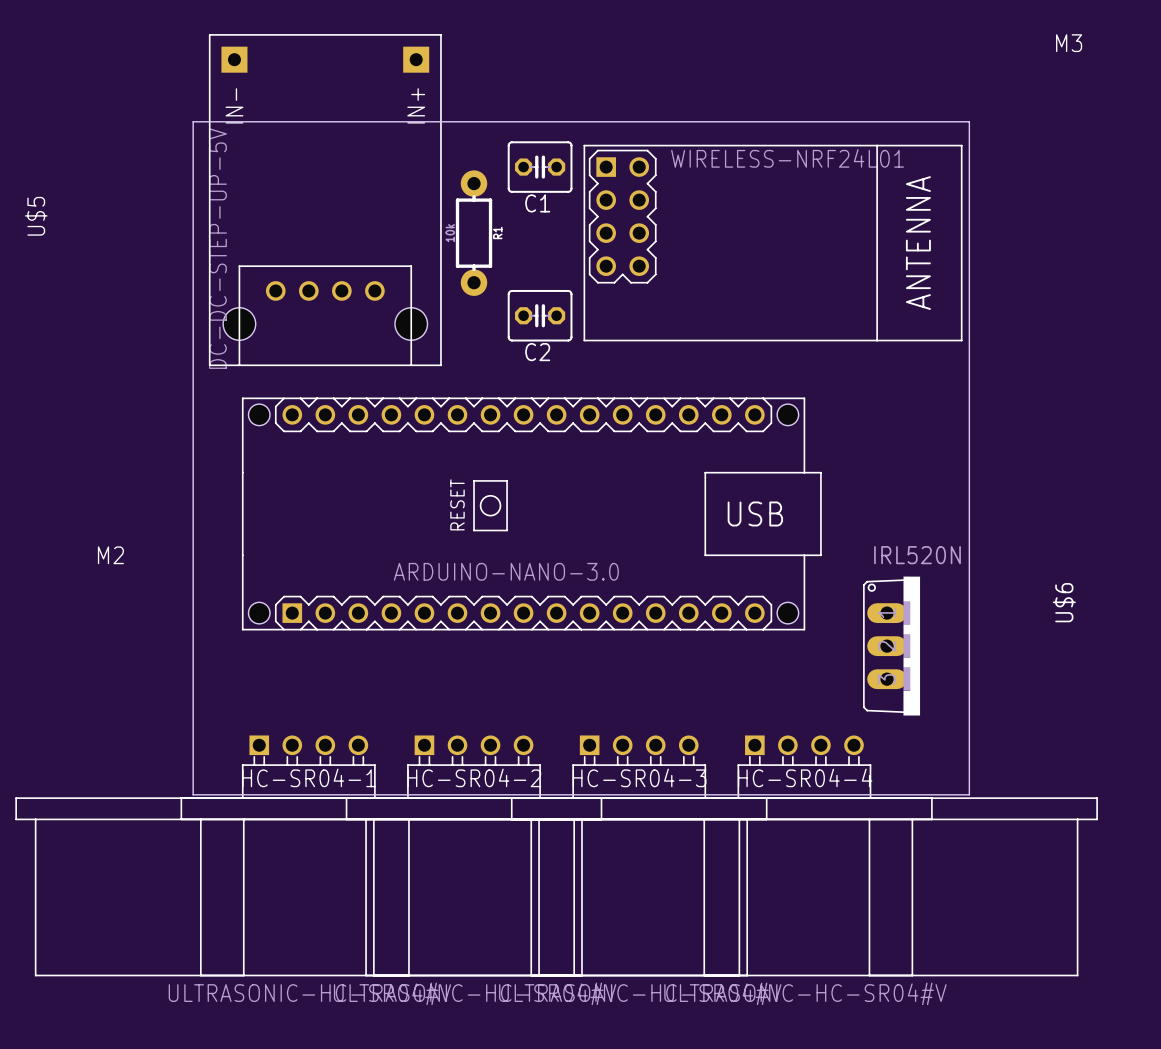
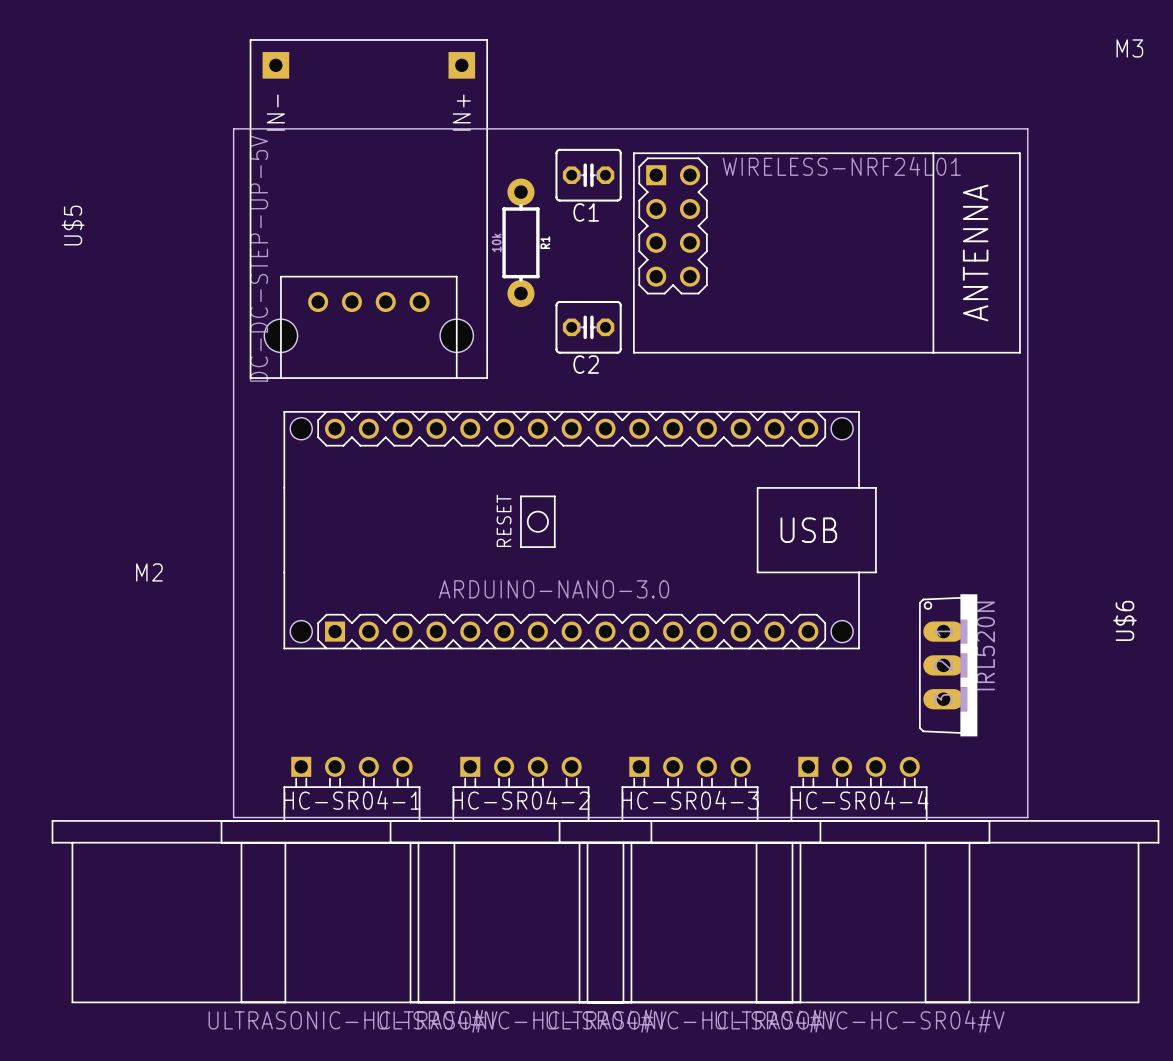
U$6 value rotation: 0° (917, 555) -> 90° counterclockwise (985, 645)

